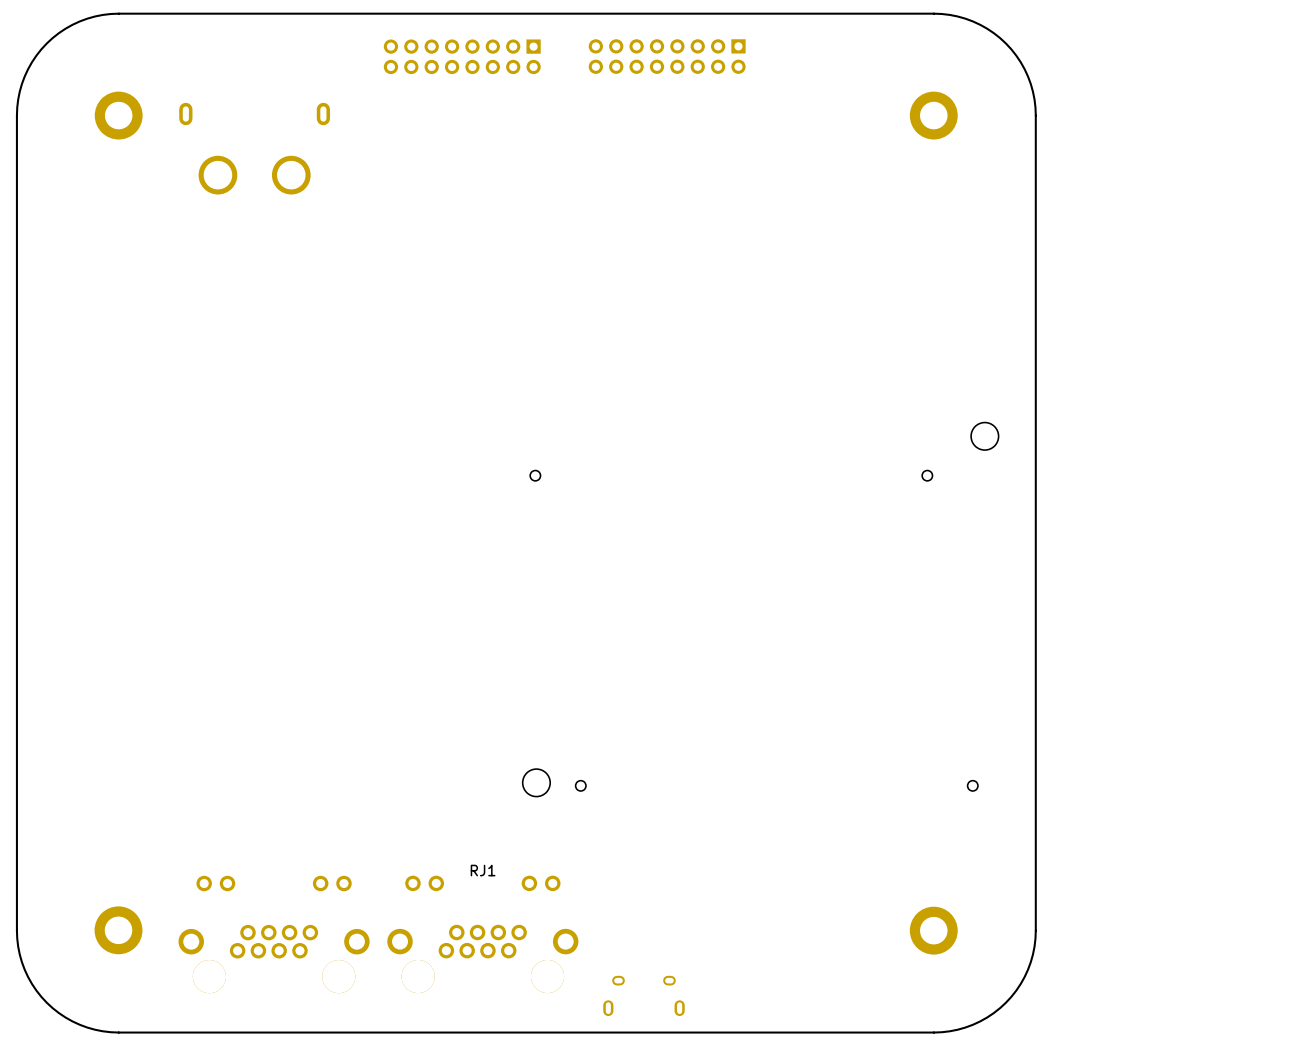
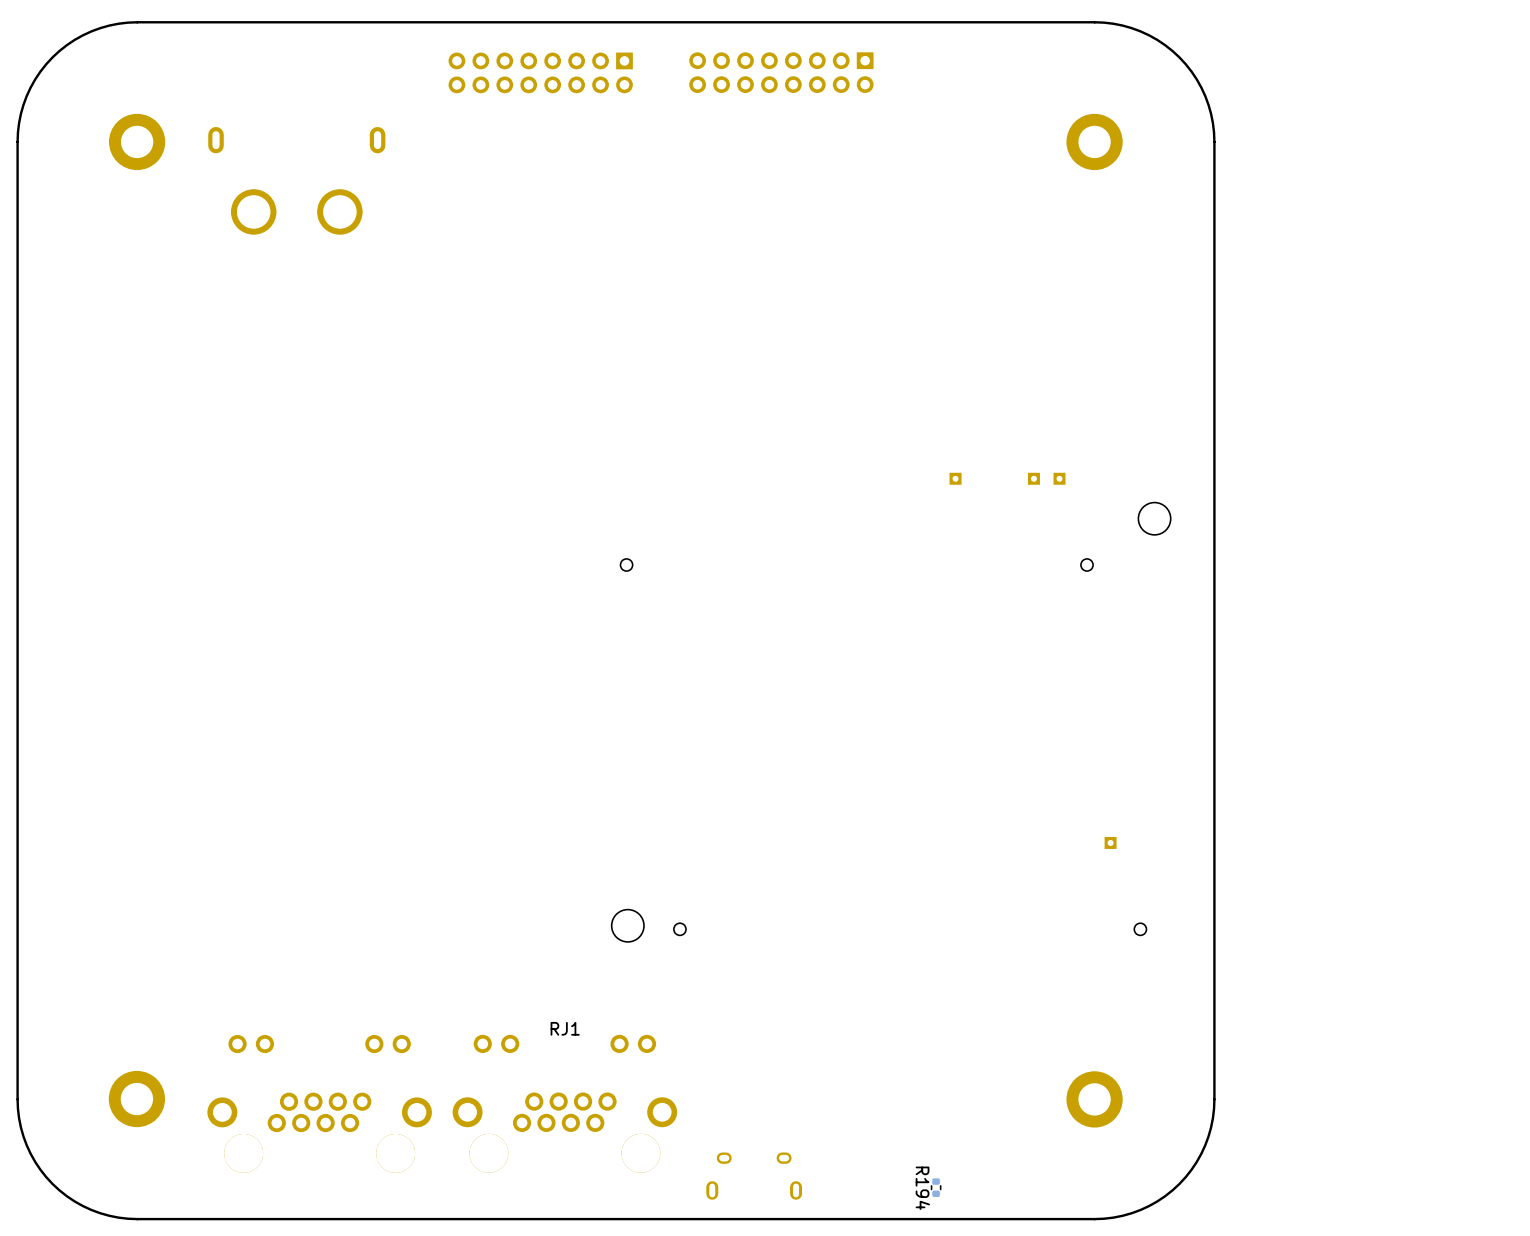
part: none -> (955, 478)
part: none -> (1033, 478)
part: none -> (1059, 478)
part: none -> (1110, 842)
R194: none -> (936, 1187)

